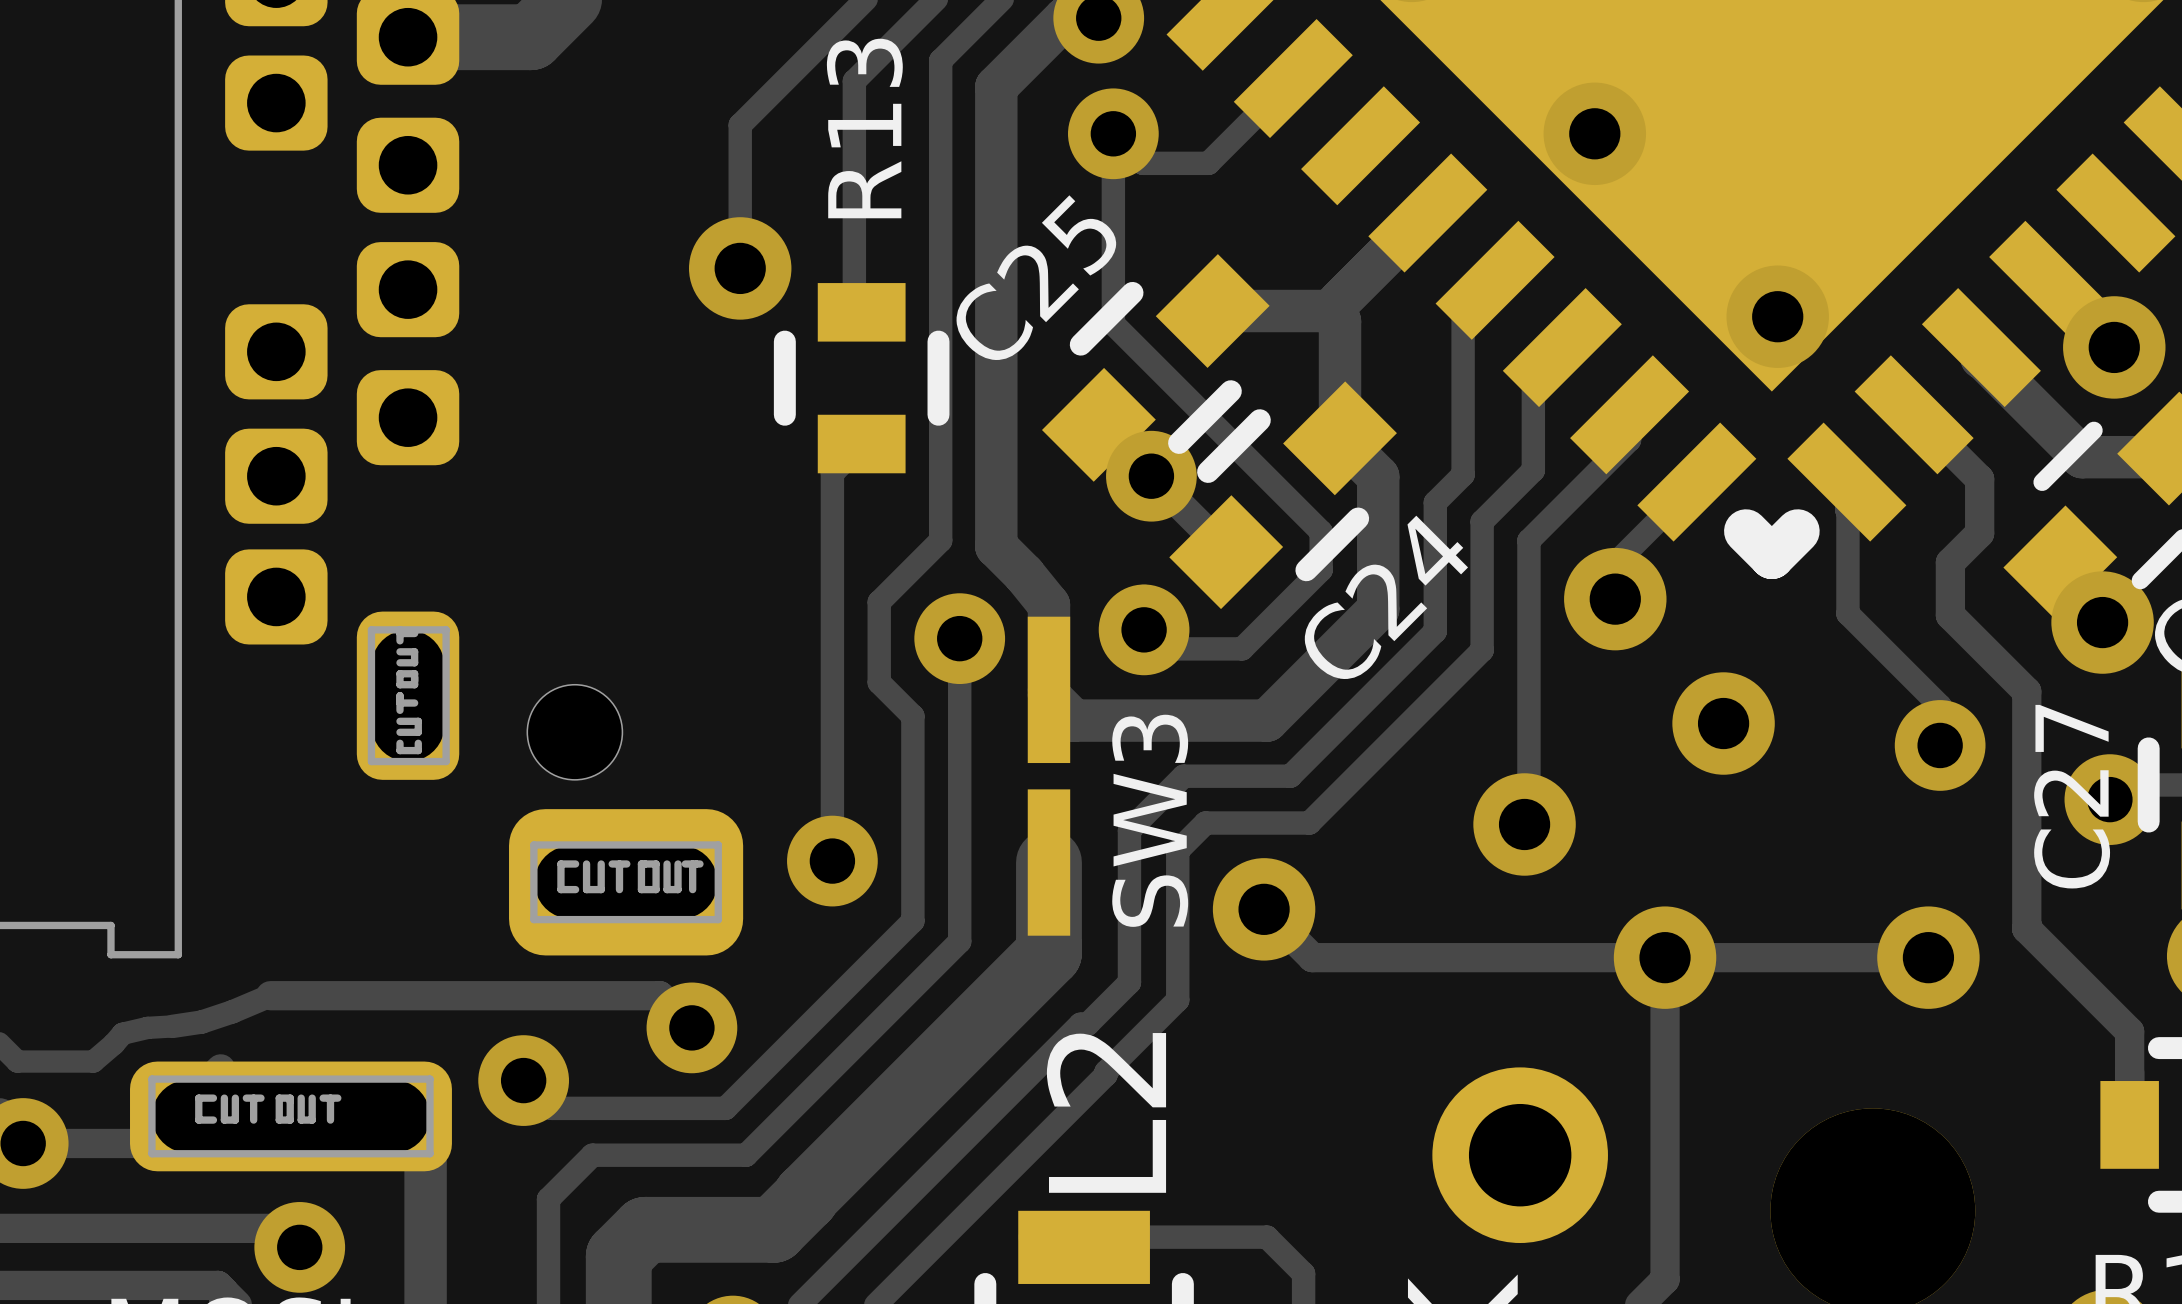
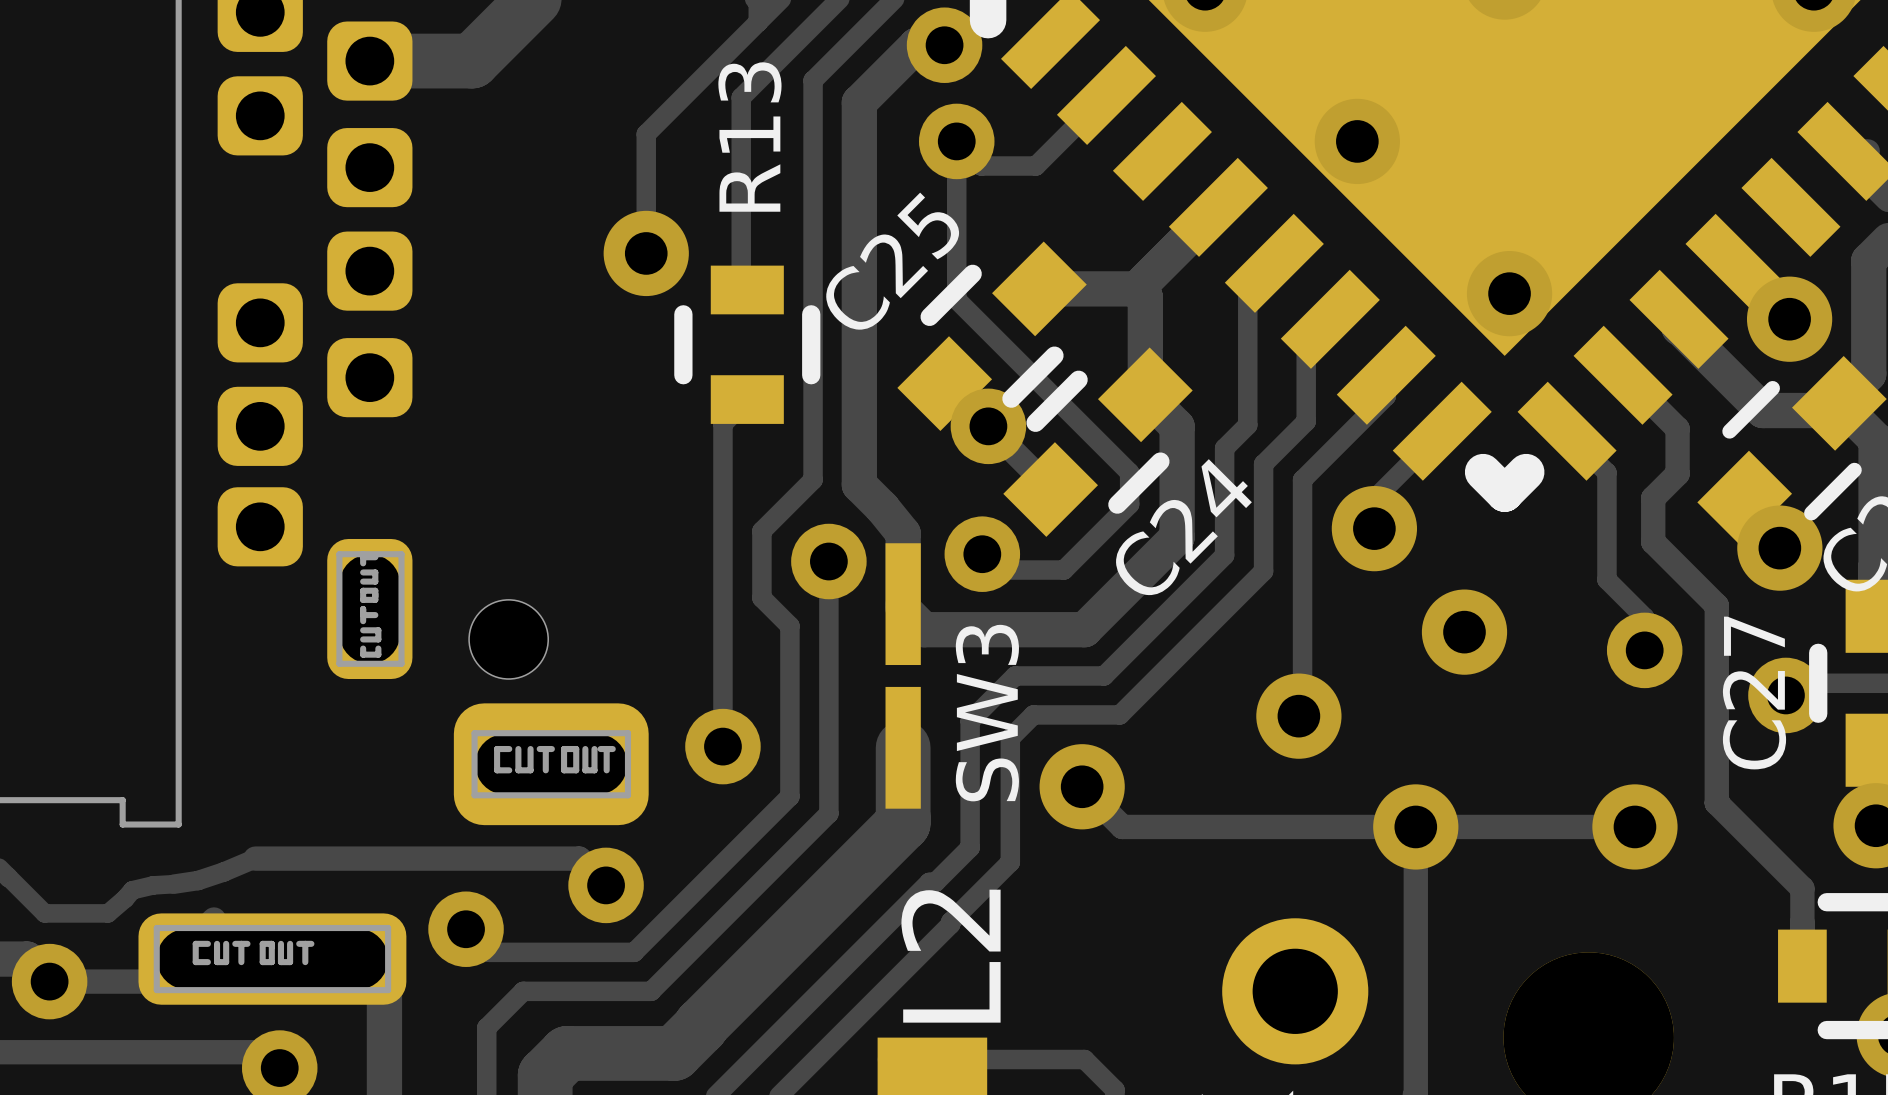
track: (1847, 511) (1847, 613) (1894, 660) -> (1567, 432) (1606, 472) (1606, 579)

